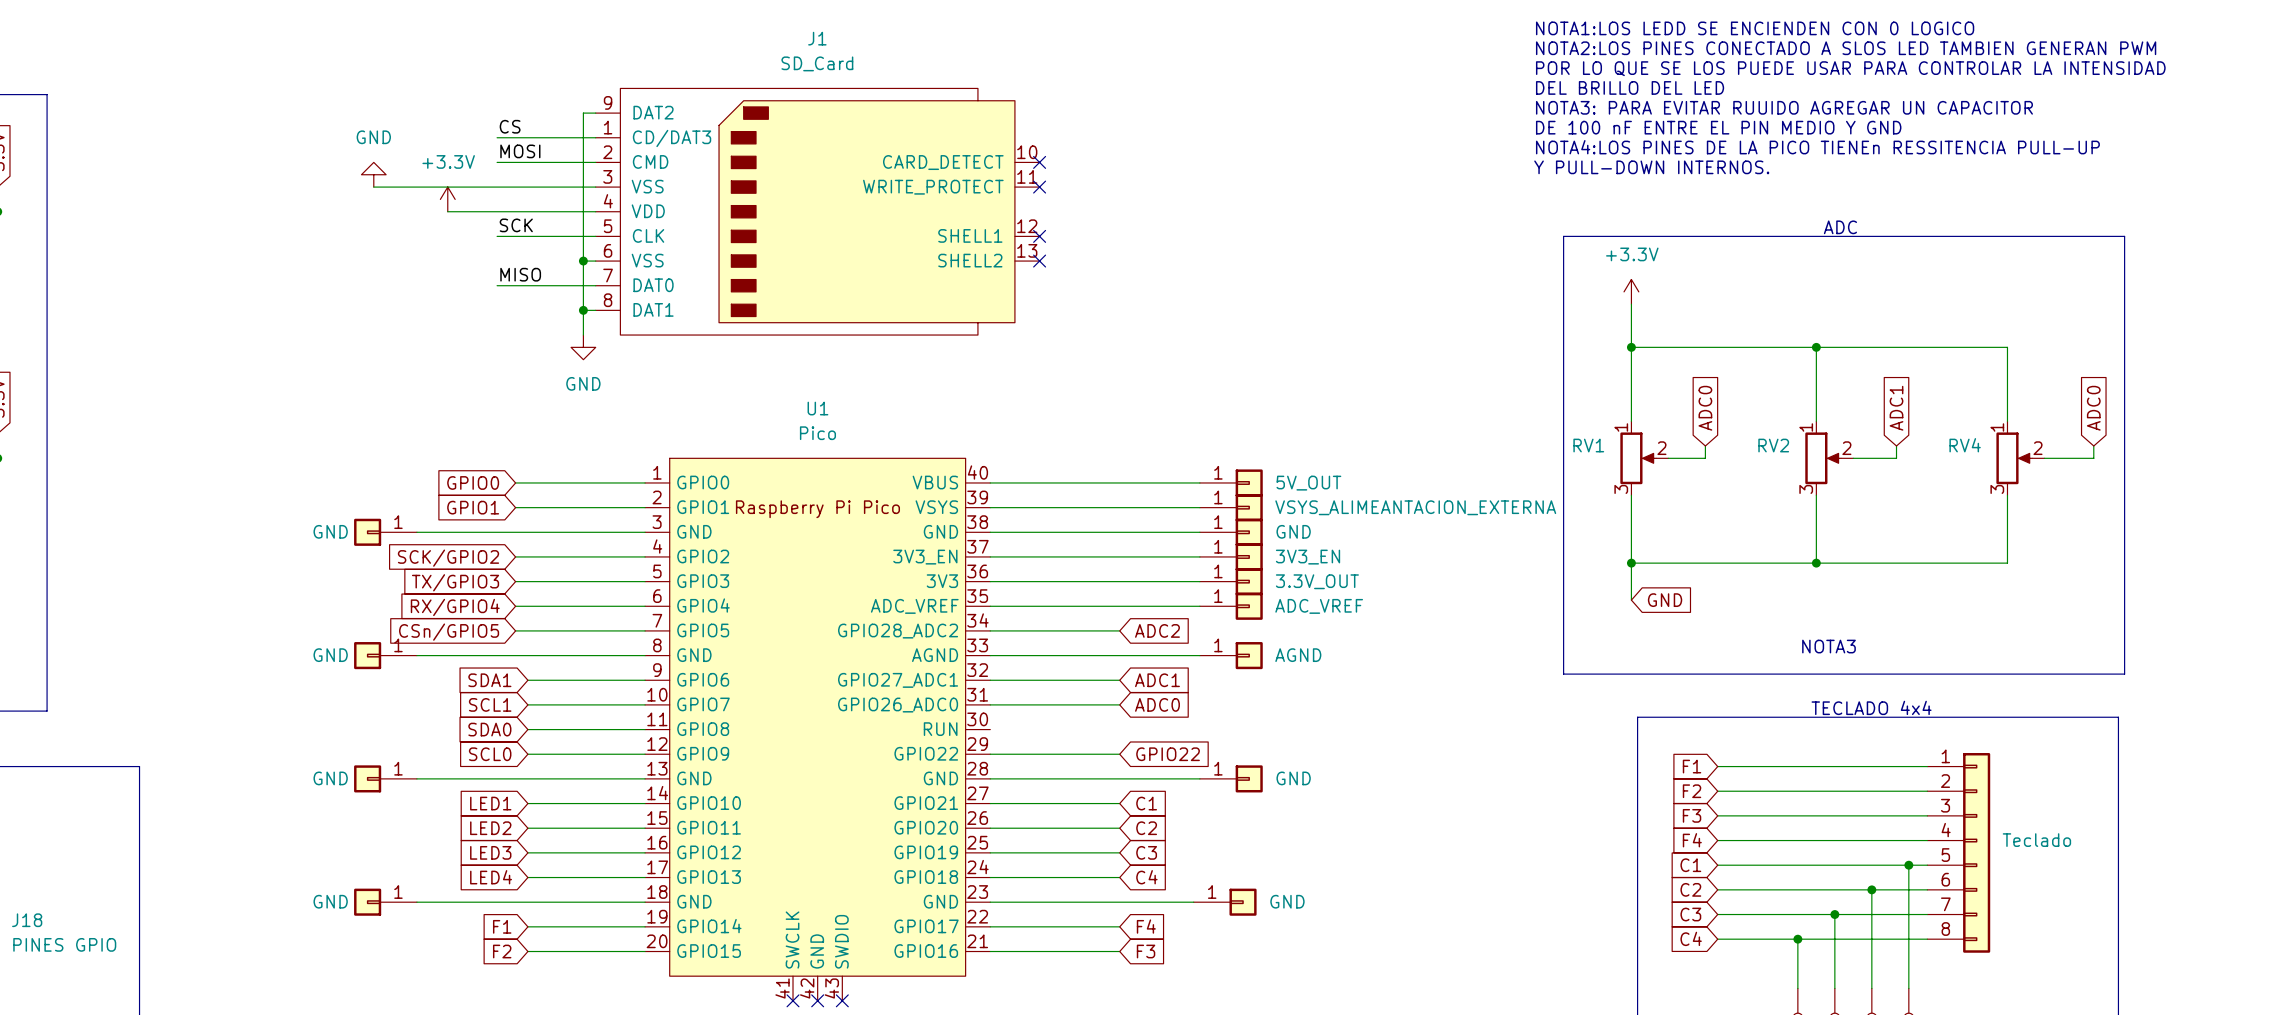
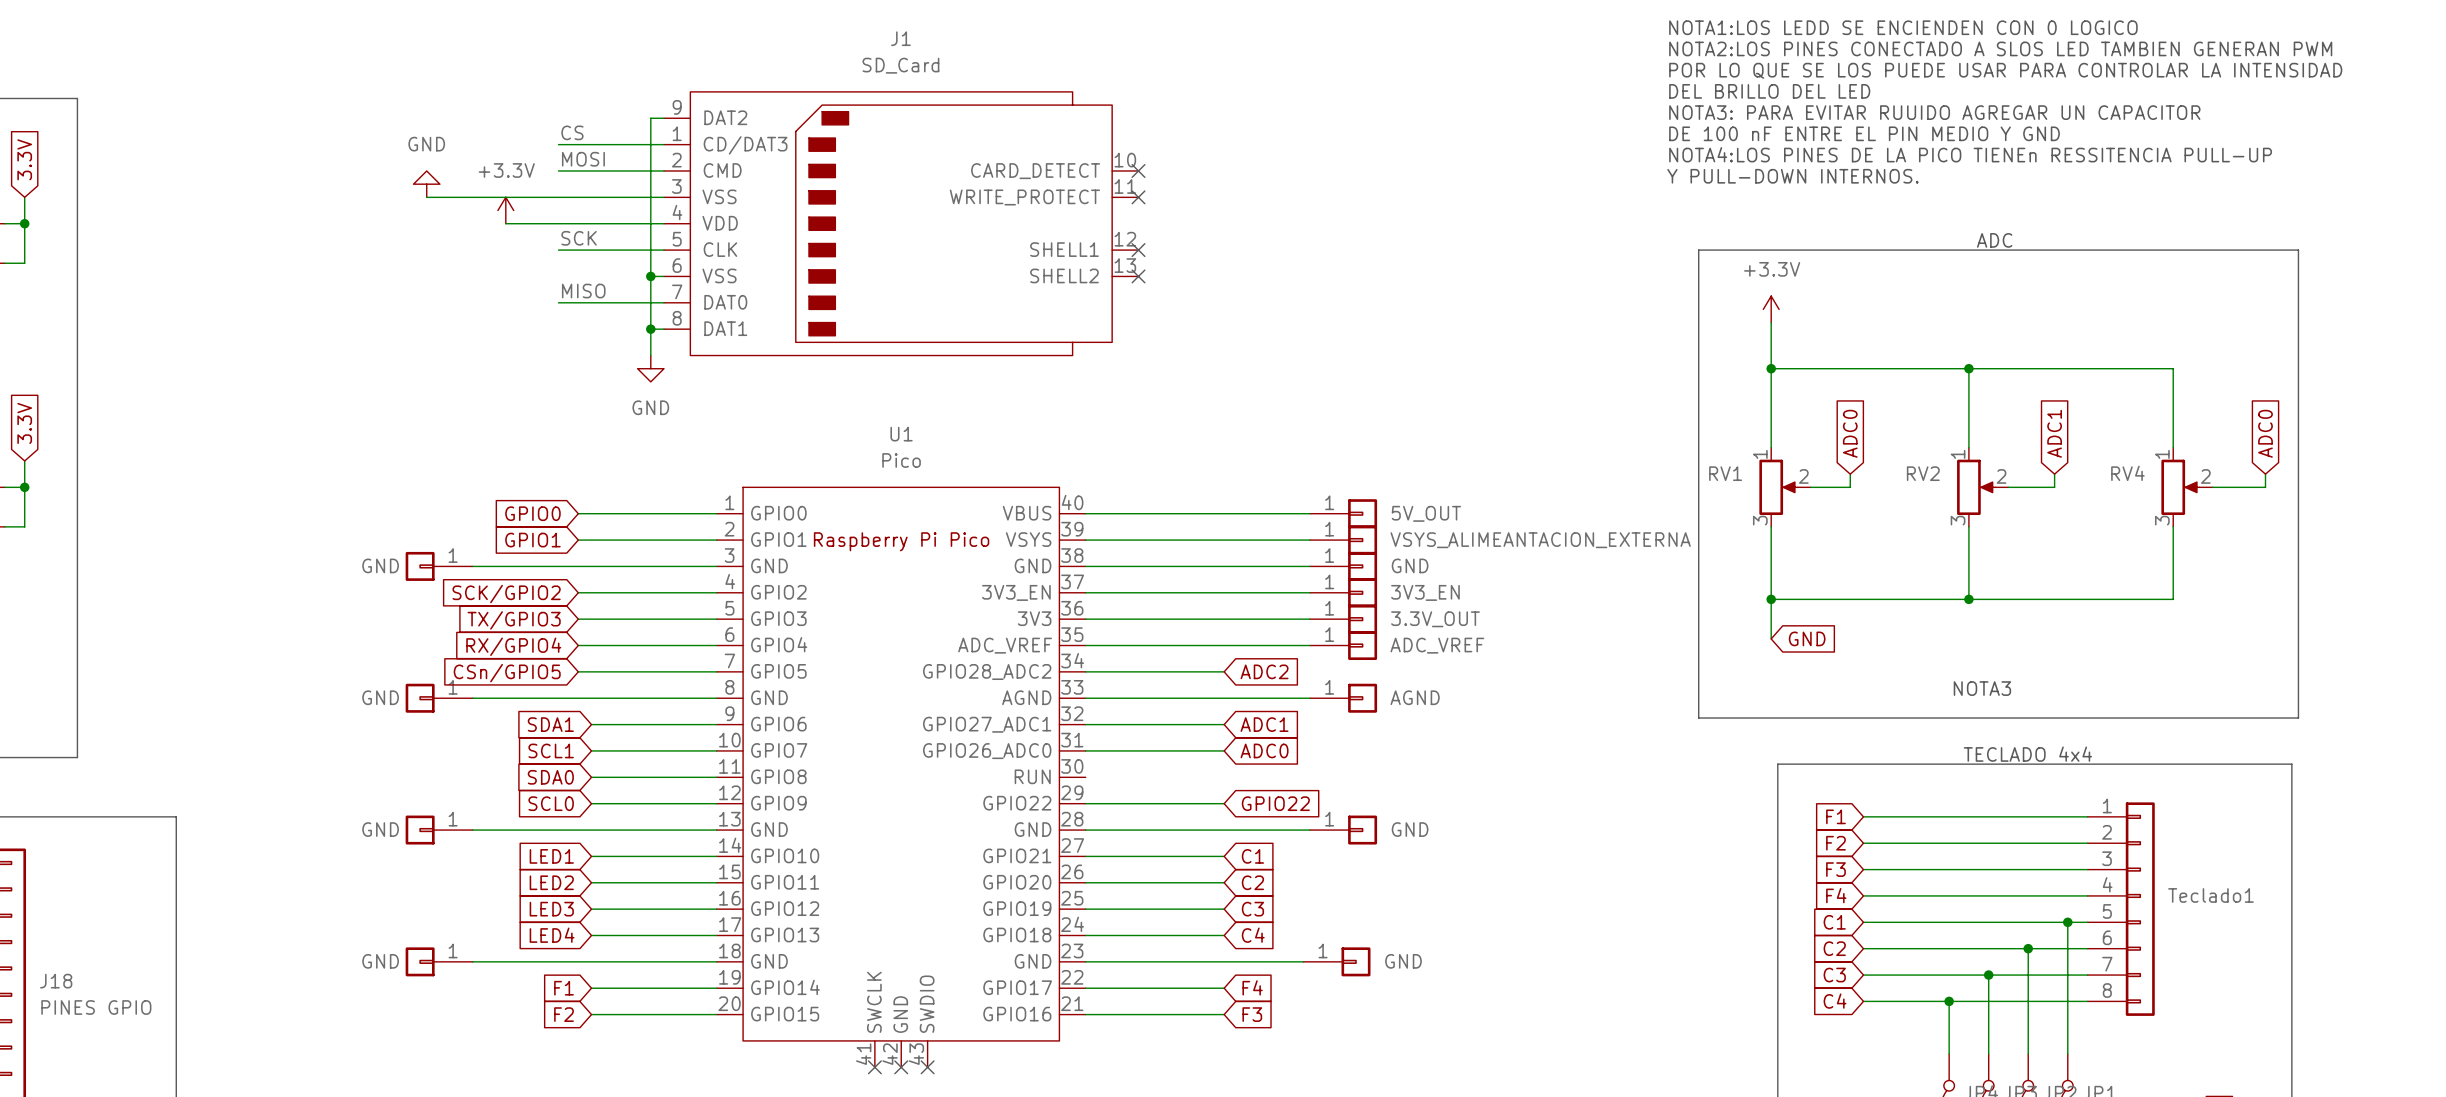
Teclado name: Teclado (2036, 840) -> Teclado1 (2210, 895)

